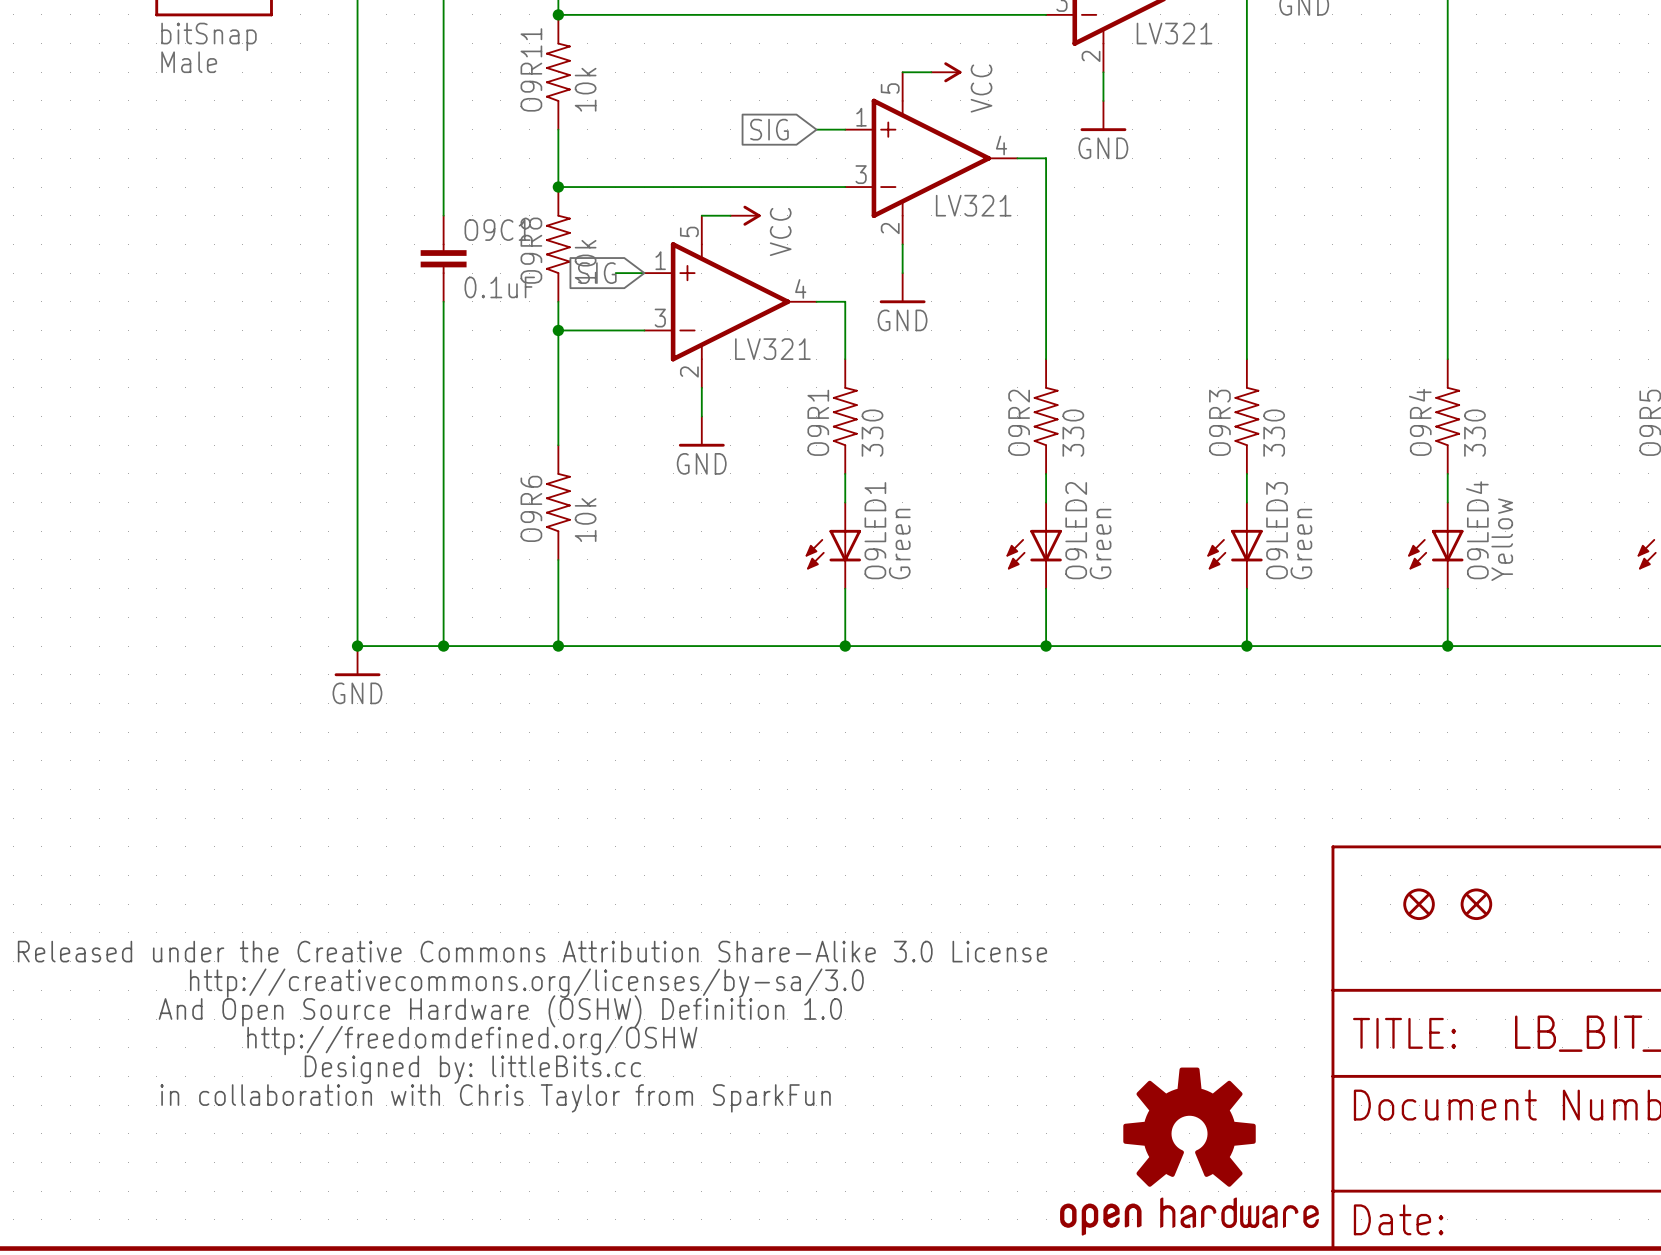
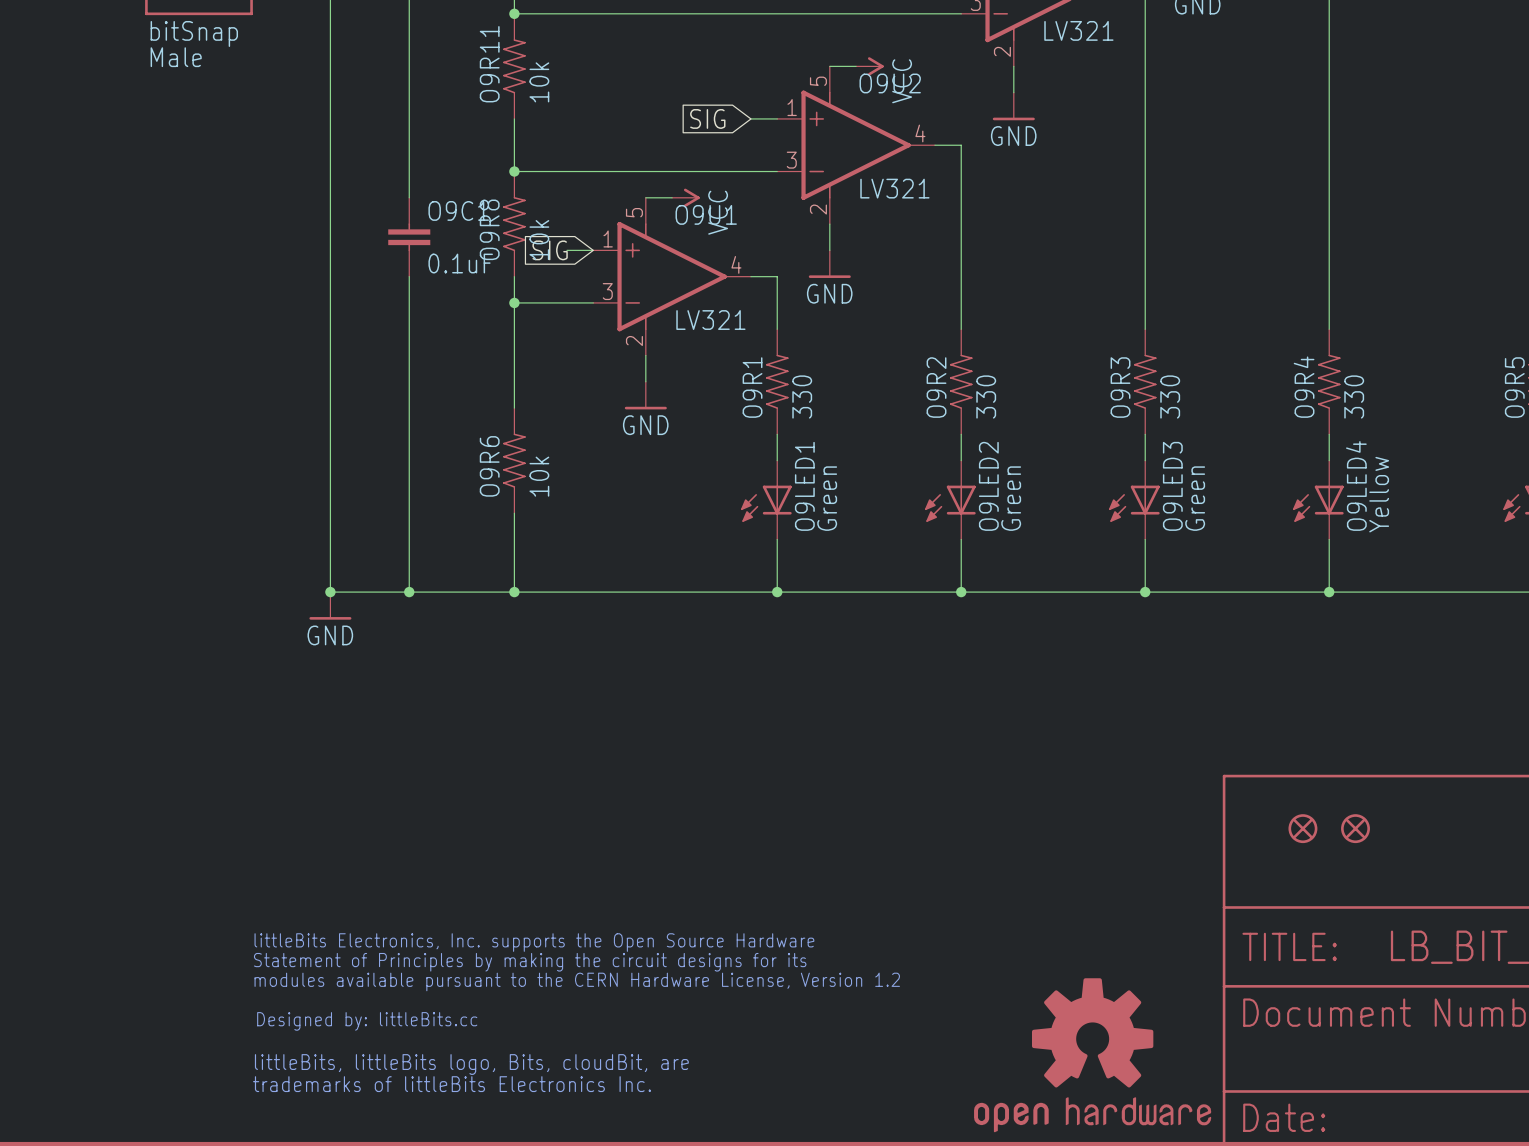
O9U2 name: none -> O9U2 (890, 83)
O9U1 name: none -> O9U1 (706, 214)
part: (532, 1026) -> none
part: none -> (576, 1012)

